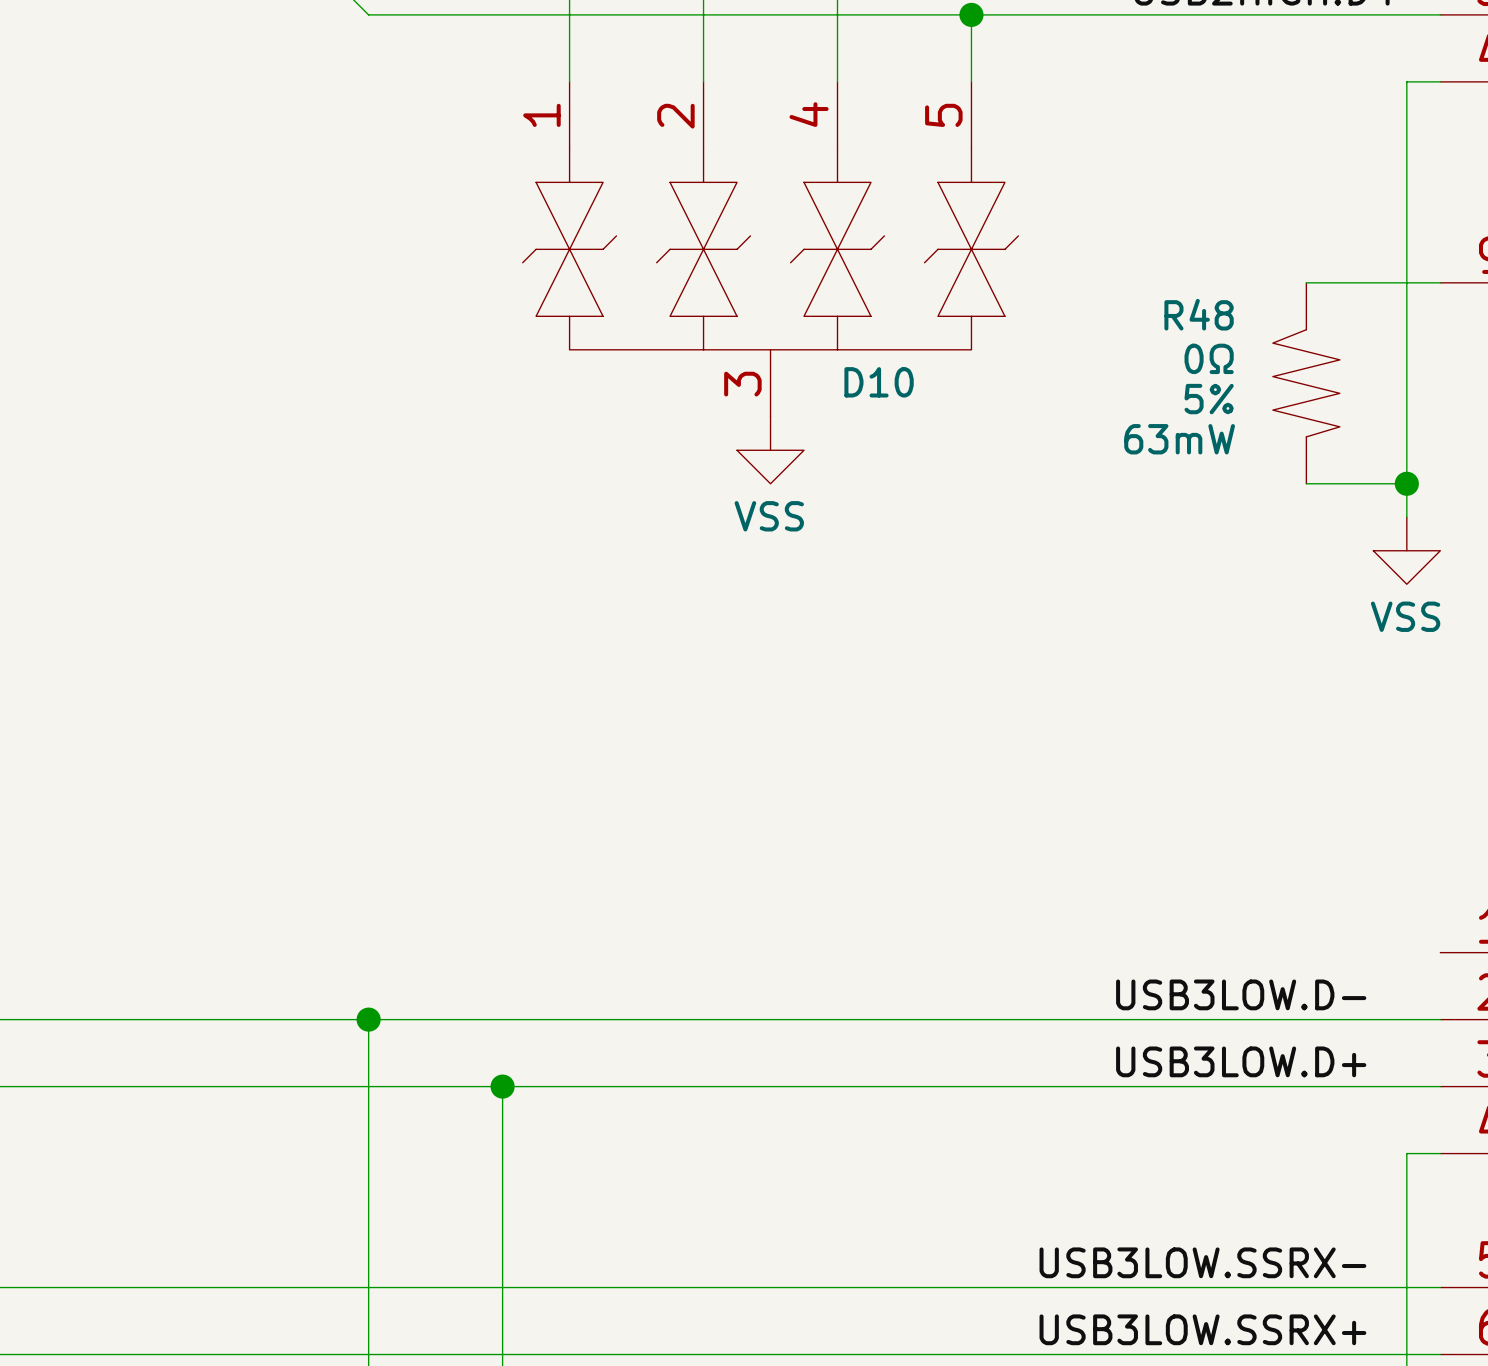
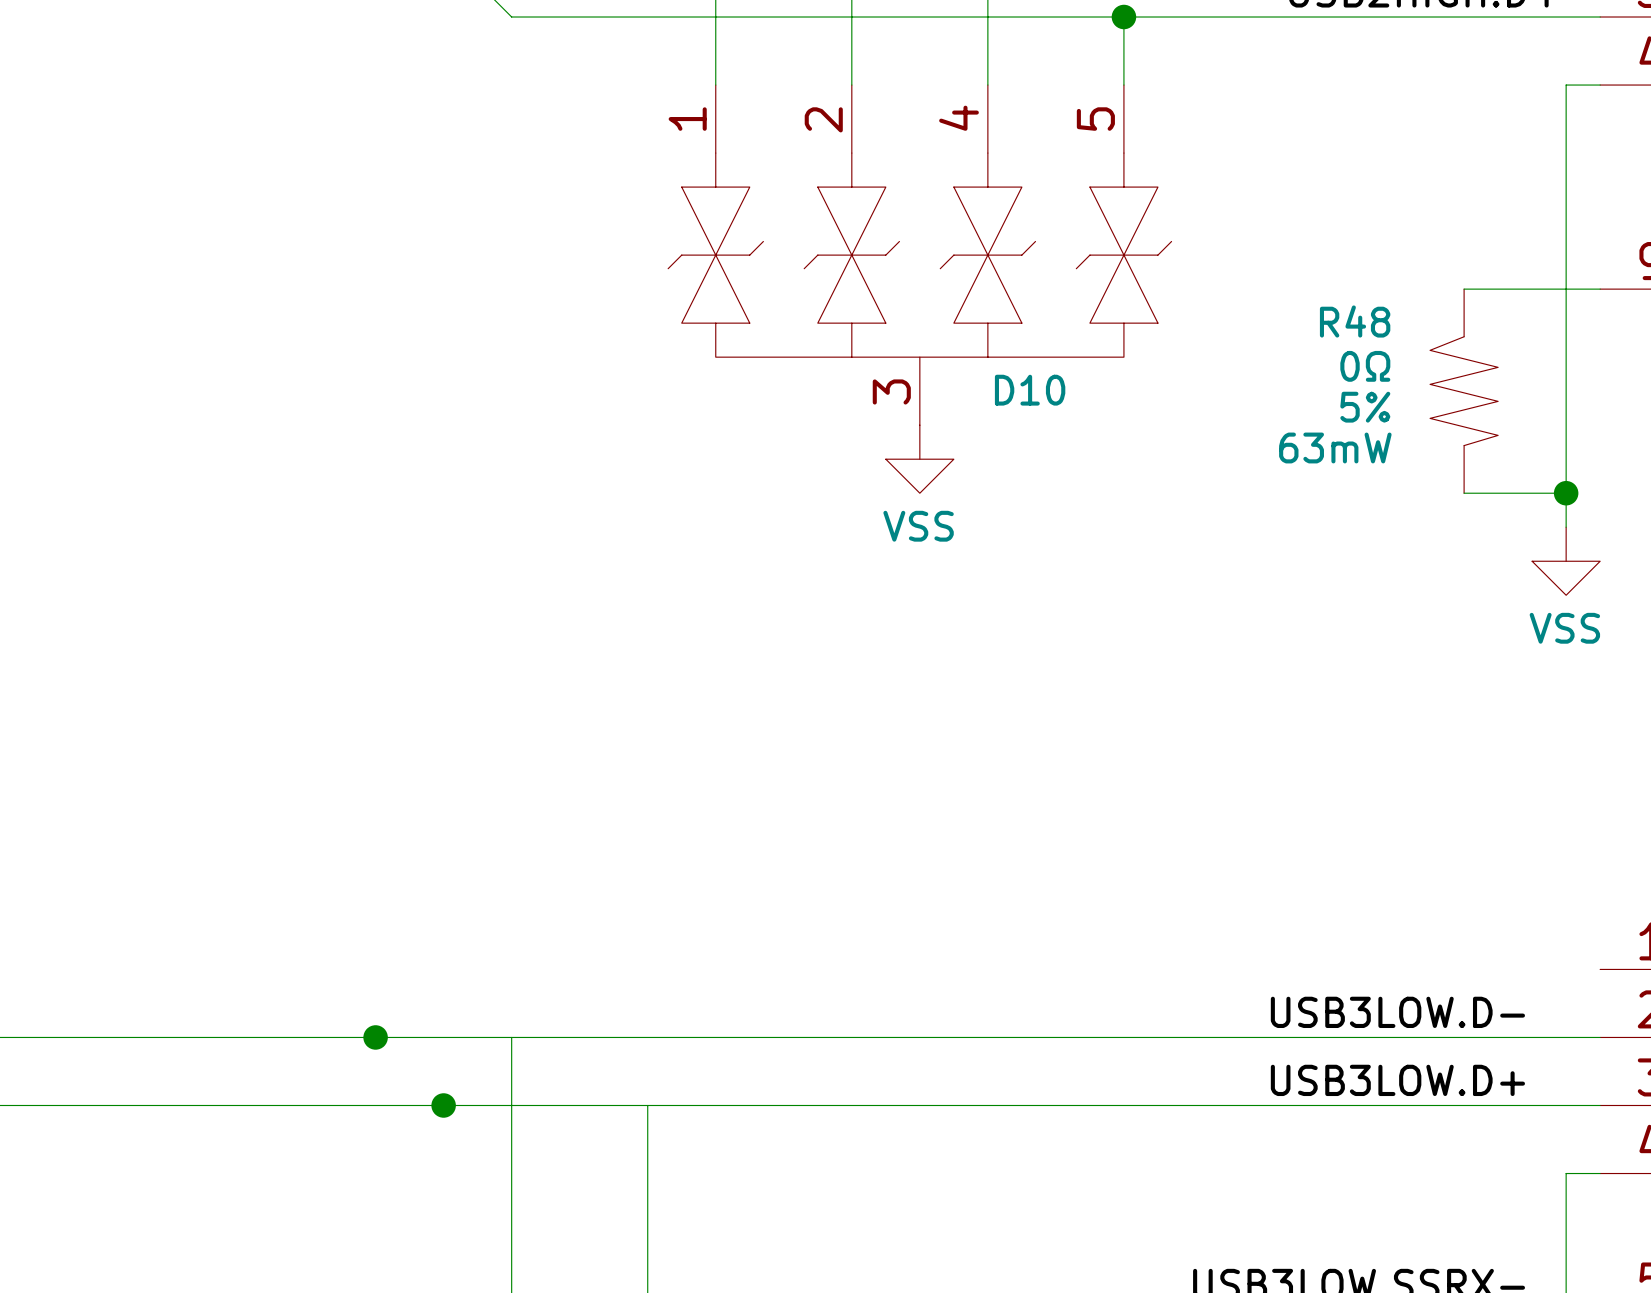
junction: none -> (375, 1037)
junction: (368, 1019) -> none
junction: none -> (443, 1105)
junction: (502, 1086) -> none

